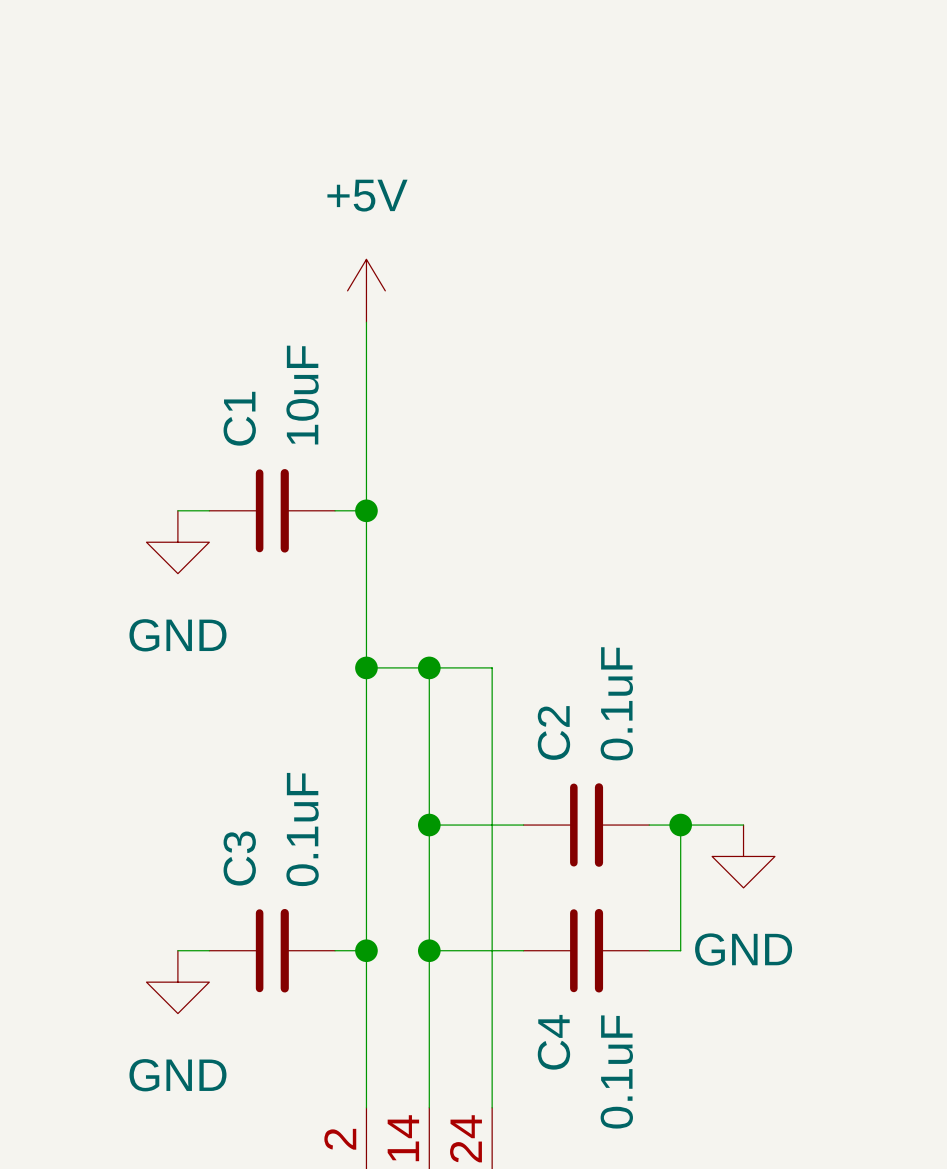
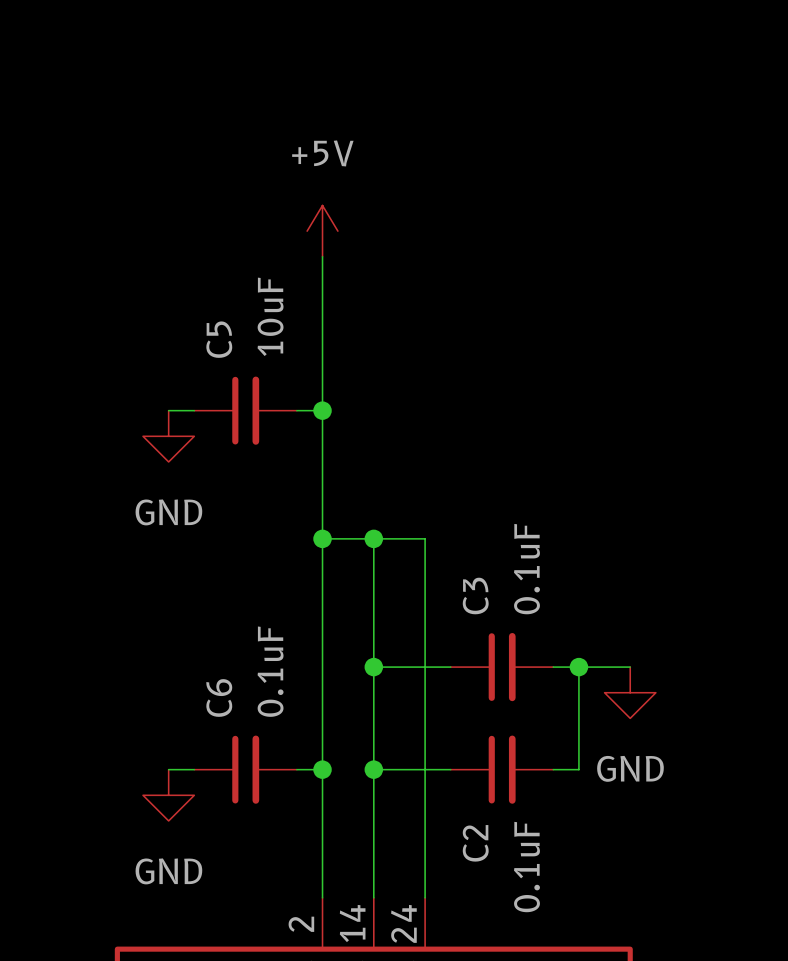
C1 name: C1 (239, 418) -> C5 (219, 339)
C2 name: C2 (553, 732) -> C3 (475, 596)
C3 name: C3 (239, 858) -> C6 (219, 697)
C4 name: C4 (553, 1042) -> C2 (475, 843)

